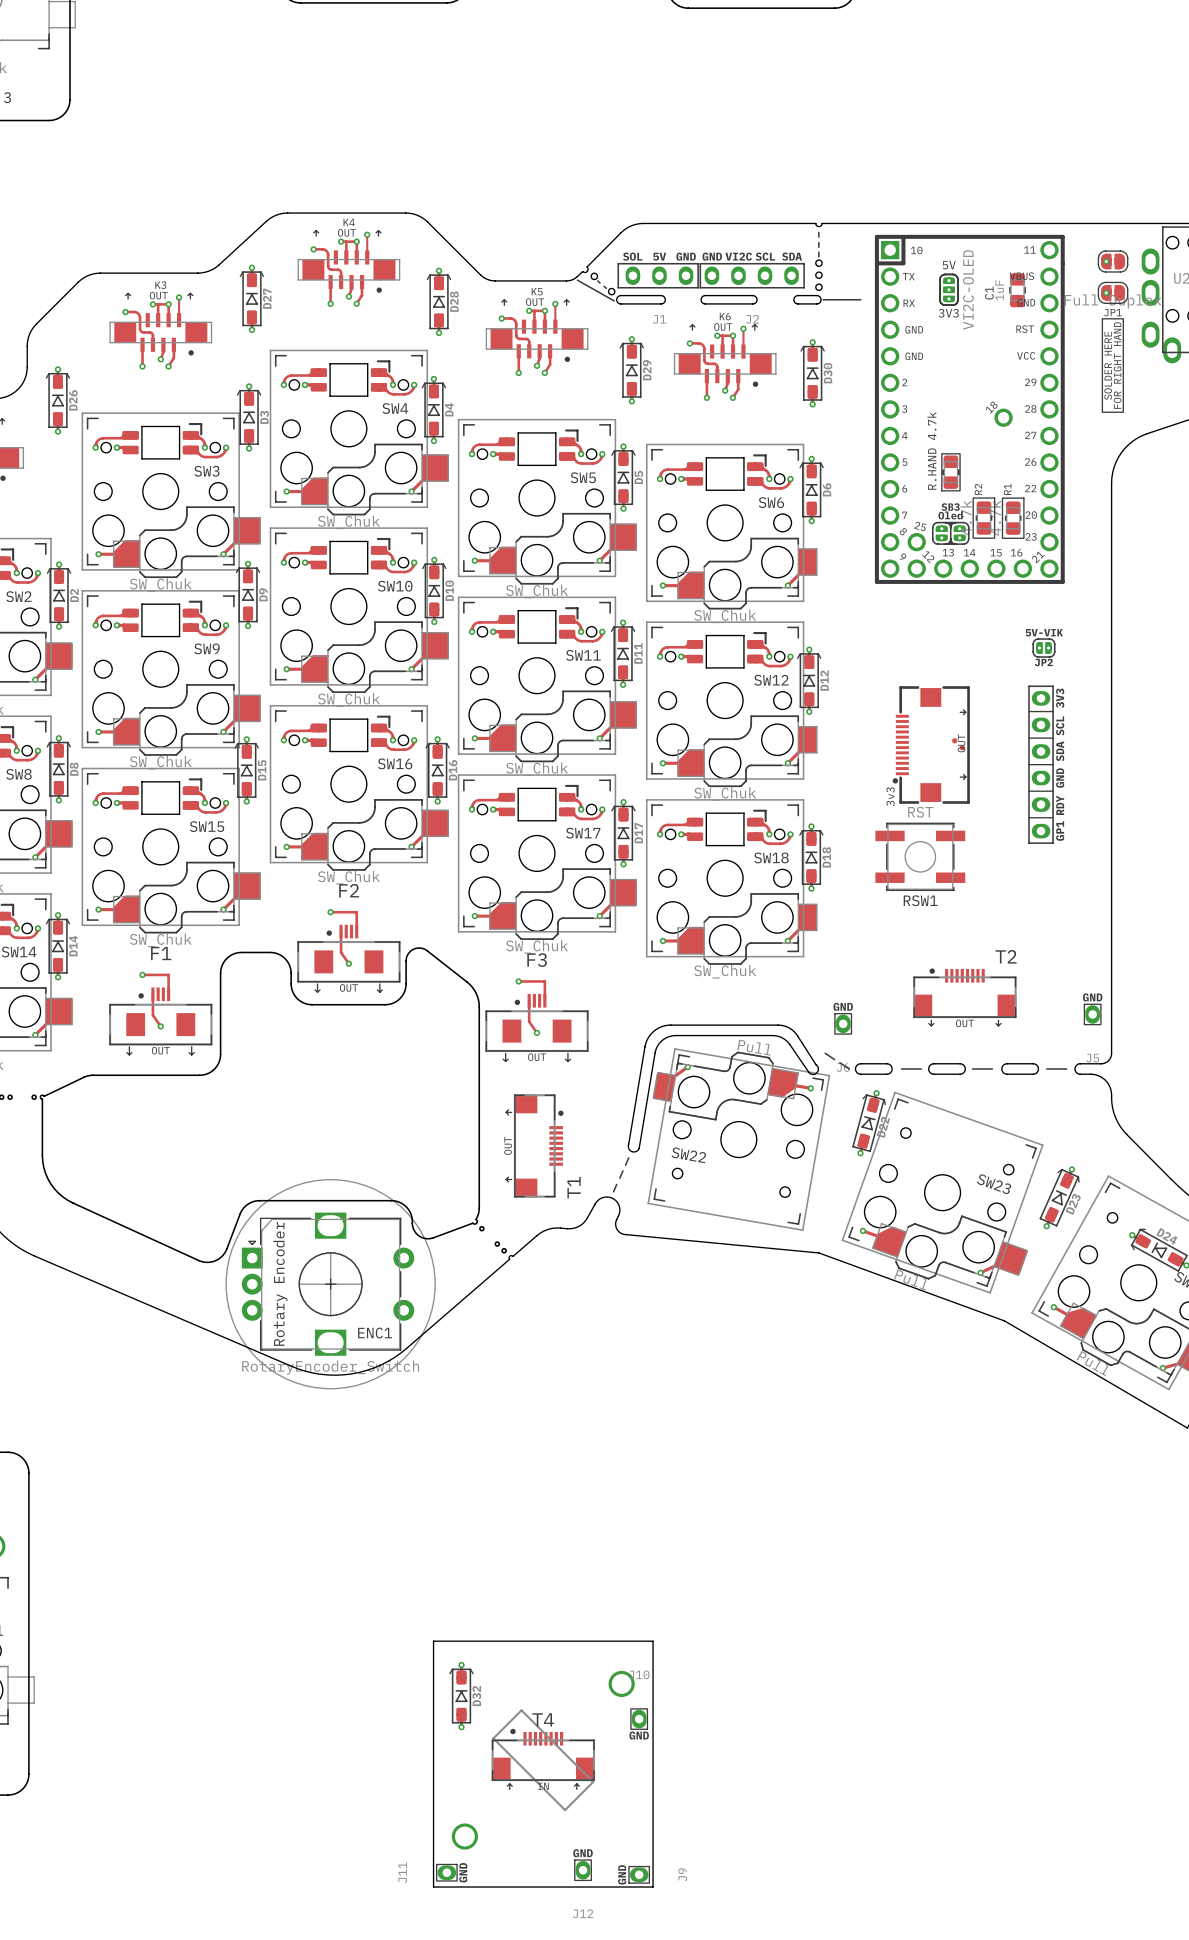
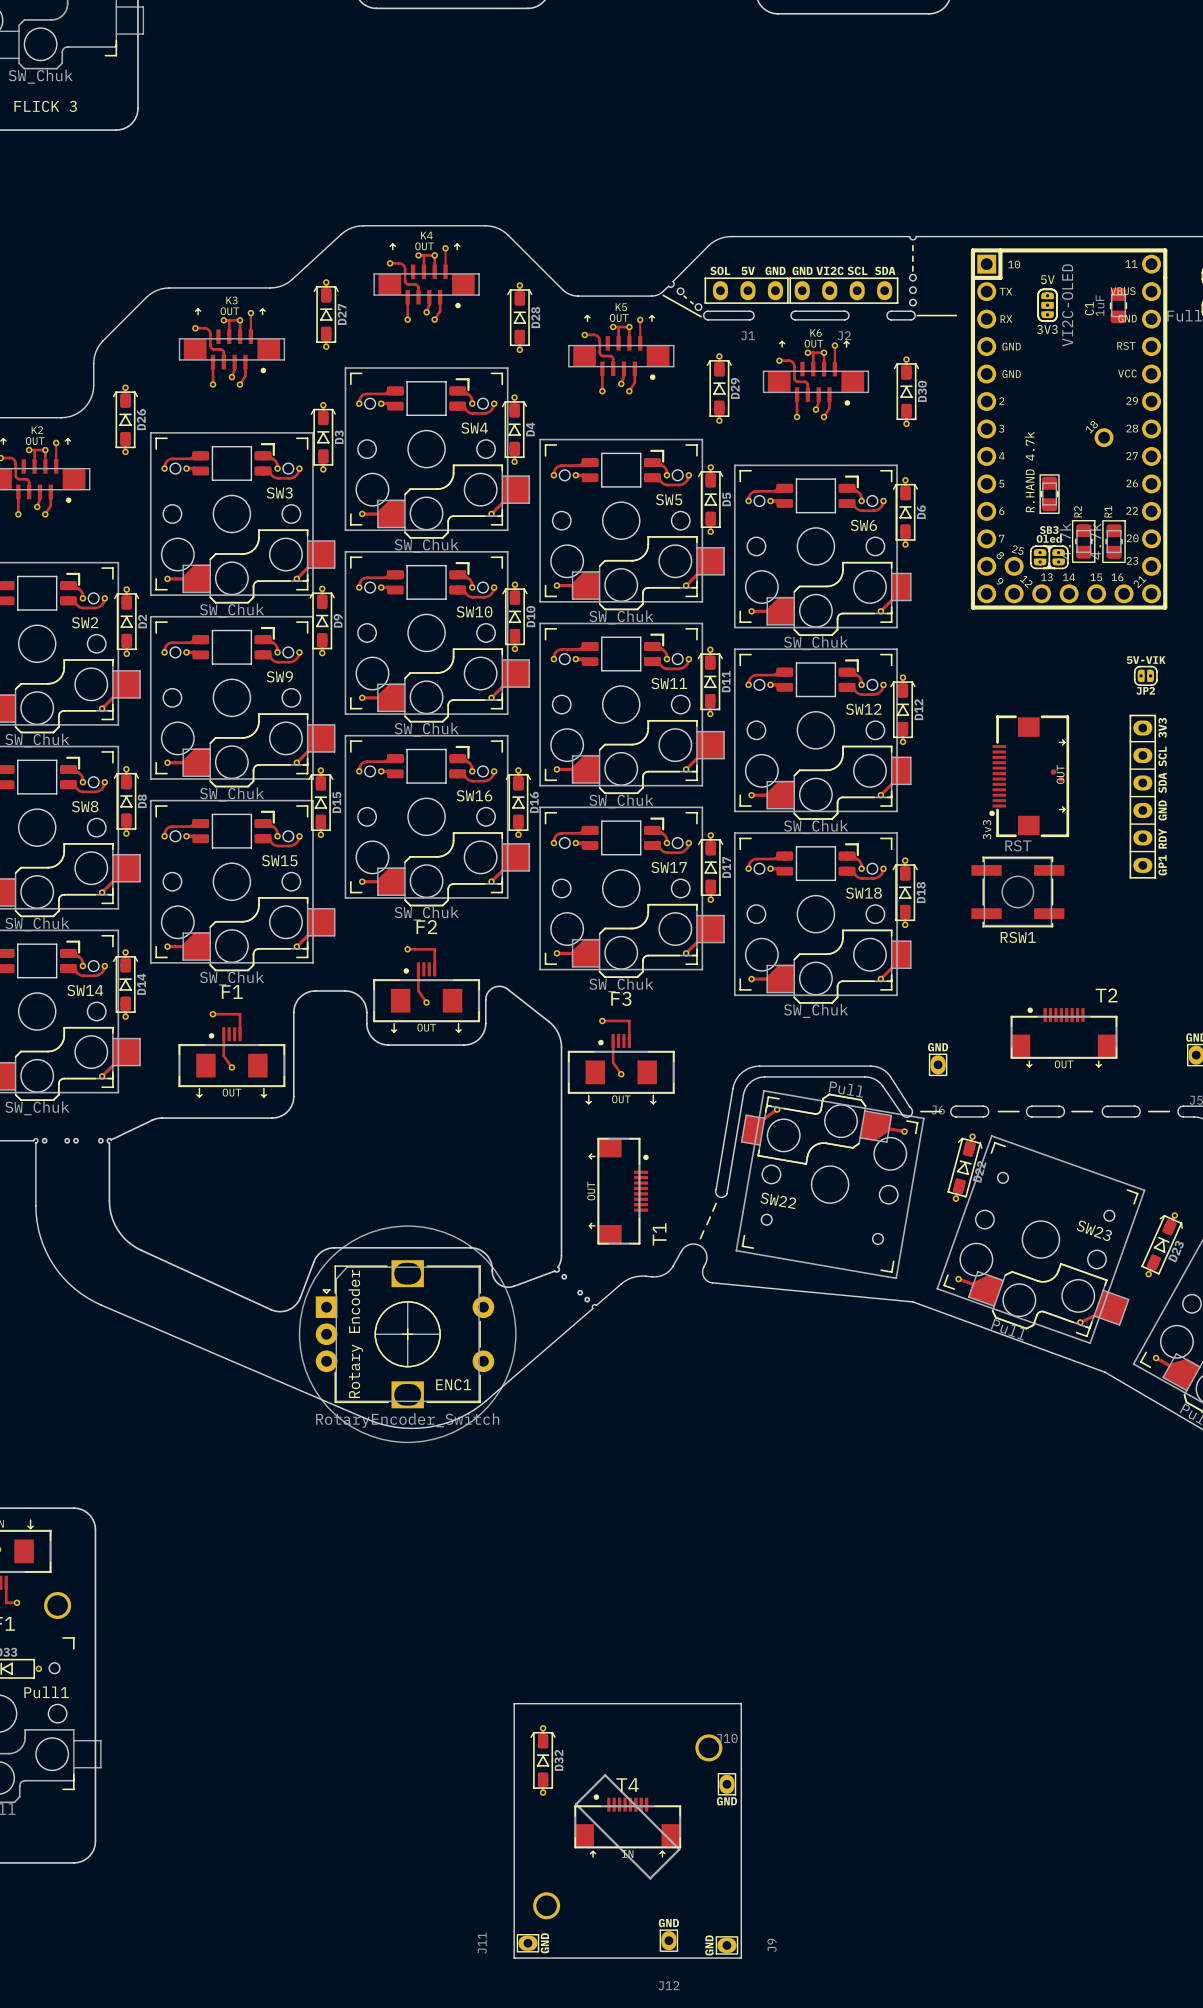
line: (825, 1053) (834, 1059) -> none
line: (839, 1062) (849, 1069) -> none
line: none -> (920, 1111) (941, 1111)

